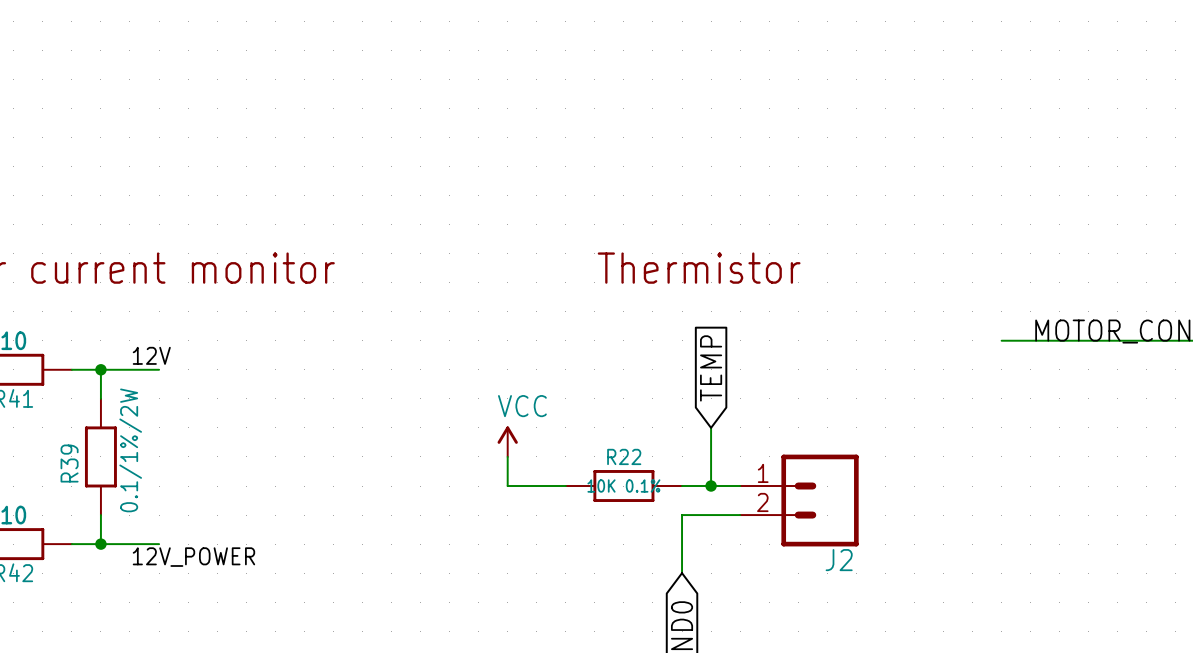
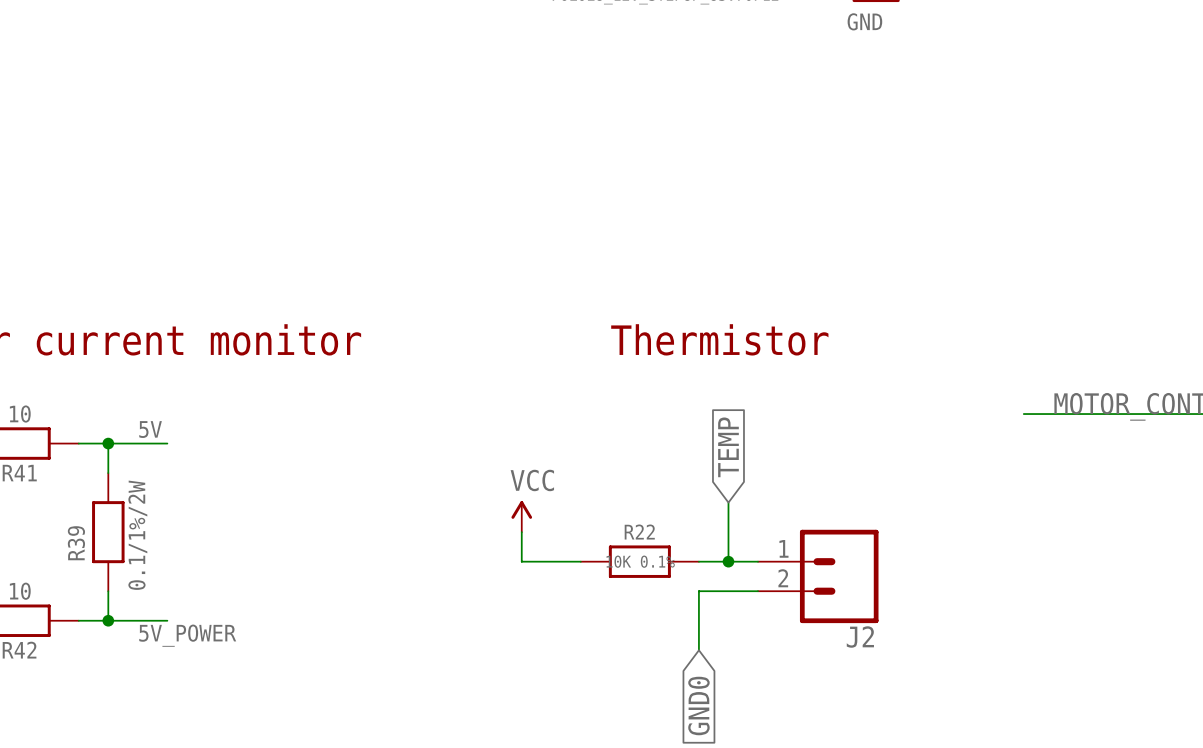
label: 12V (151, 355) -> 5V (150, 429)
label: 12V_POWER (193, 557) -> 5V_POWER (187, 635)

